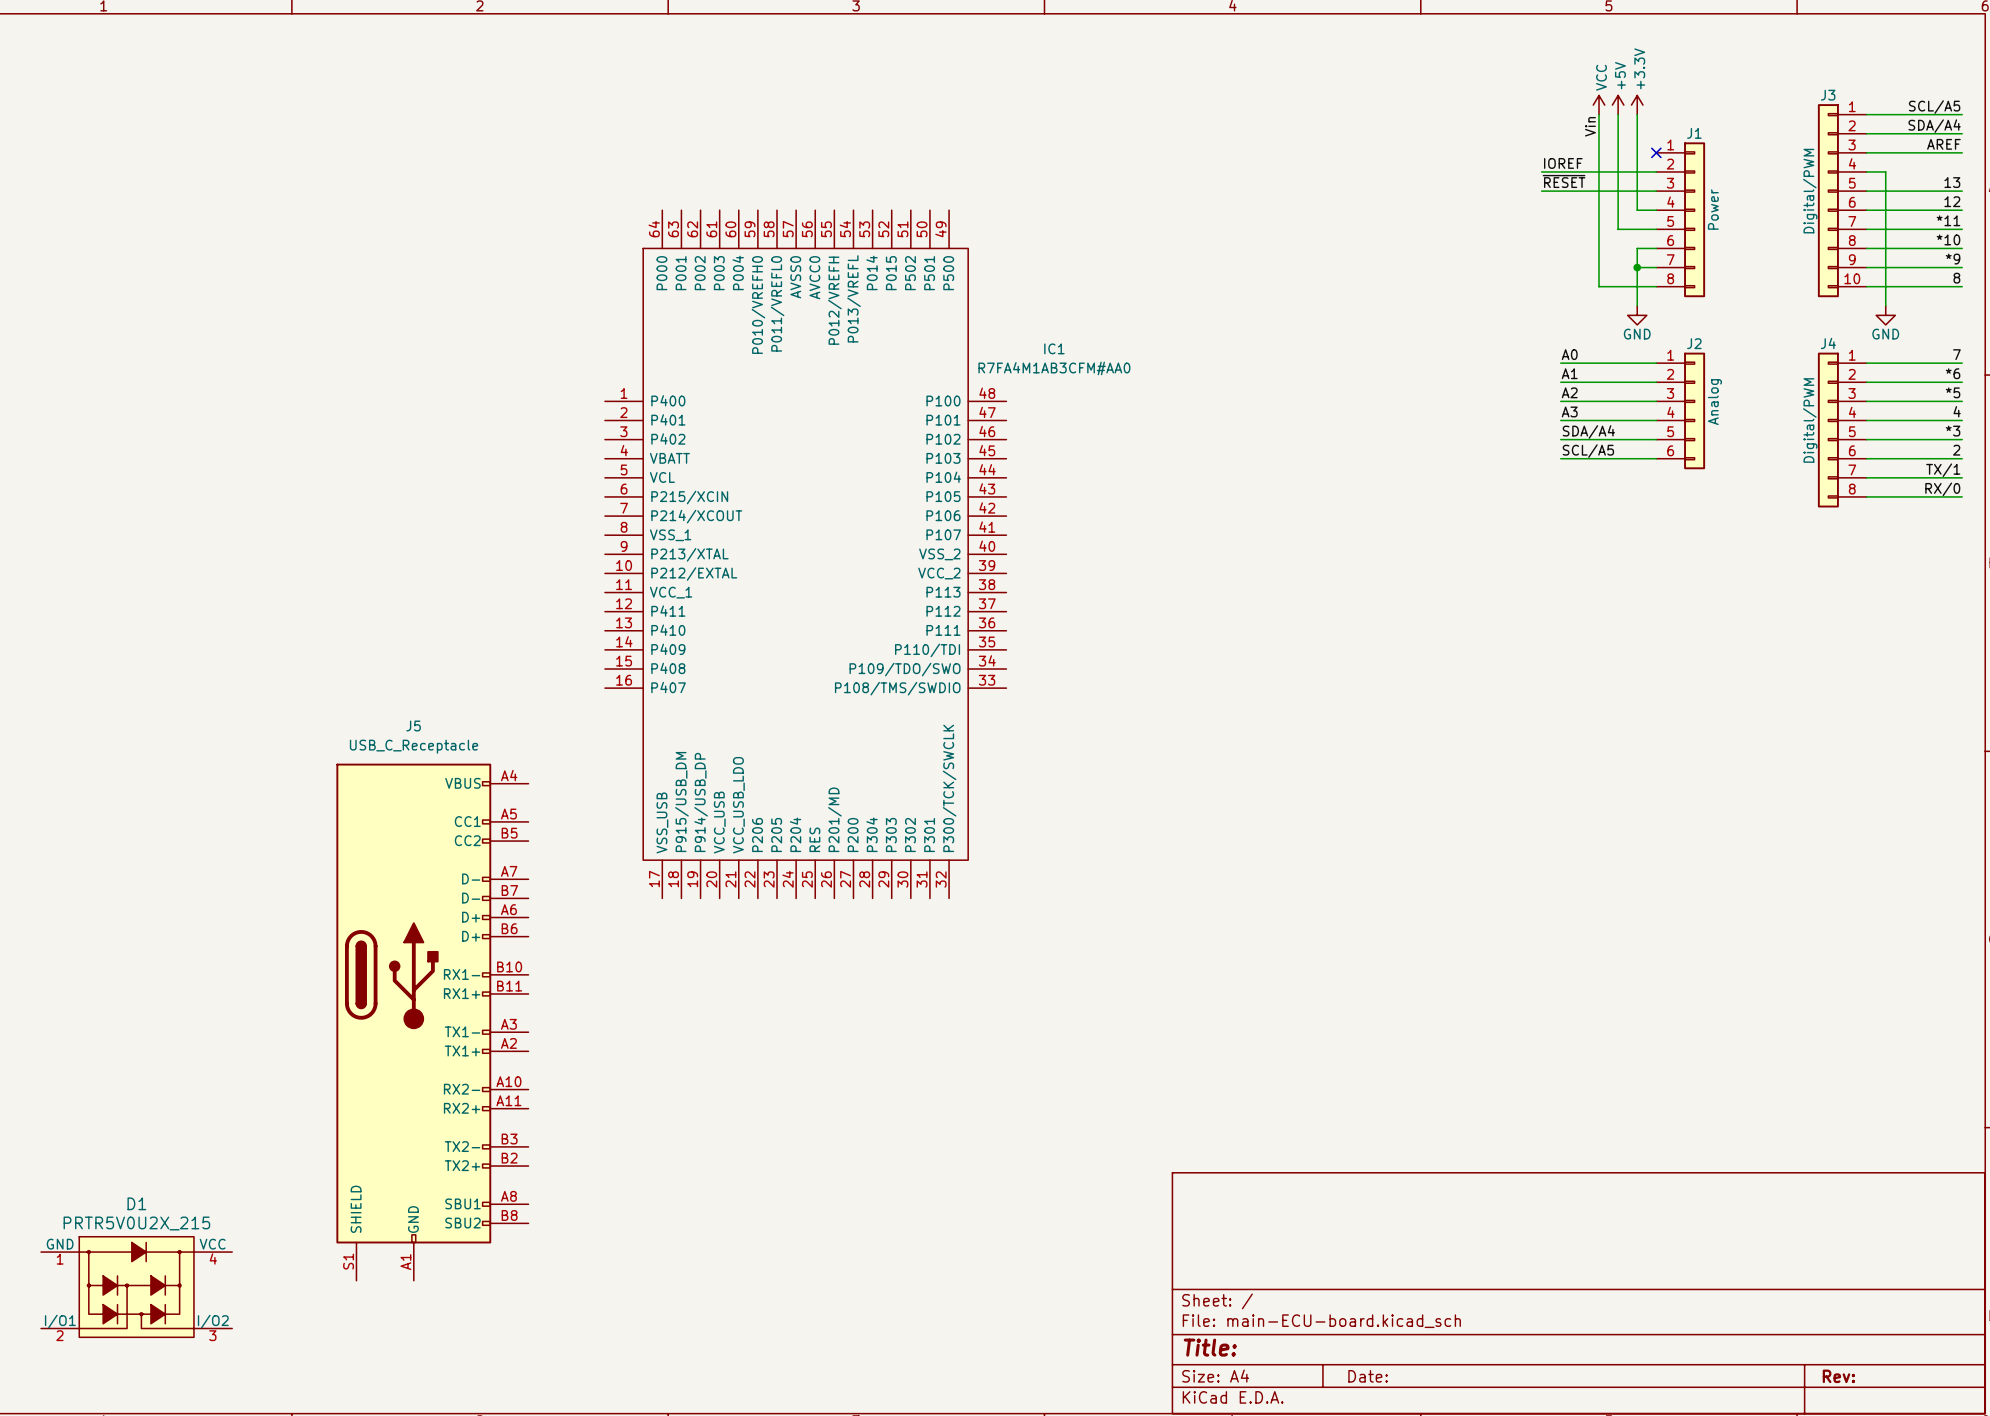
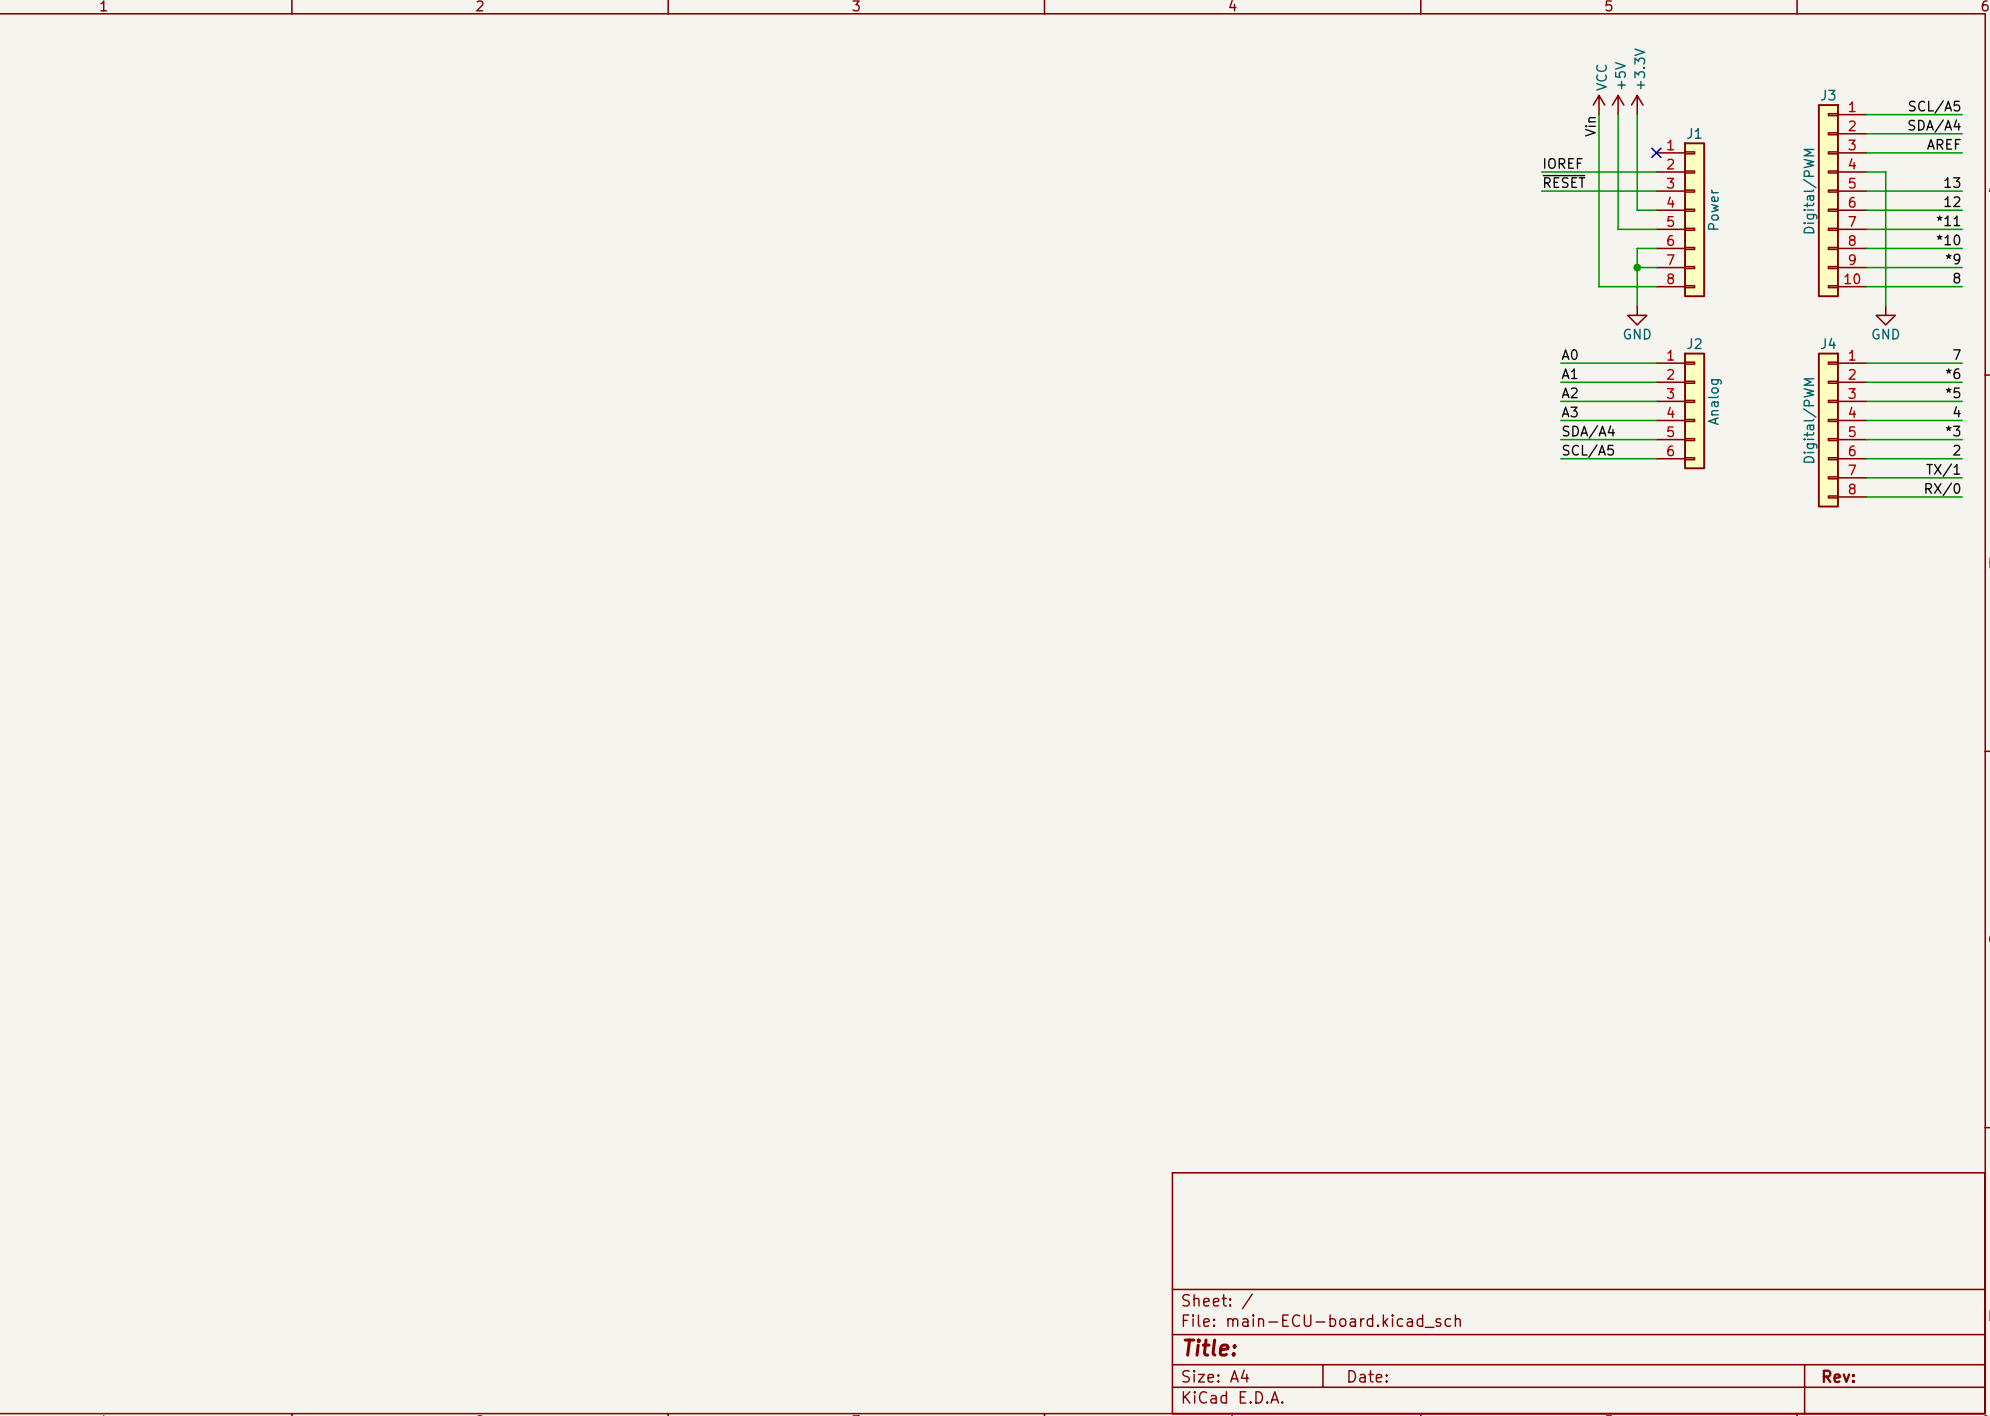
IC1: R7FA4M1AB3CFM#AA0 (805, 554) -> none
J5: USB_C_Receptacle (432, 1022) -> none
D1: PRTR5V0U2X_215 (136, 1287) -> none

